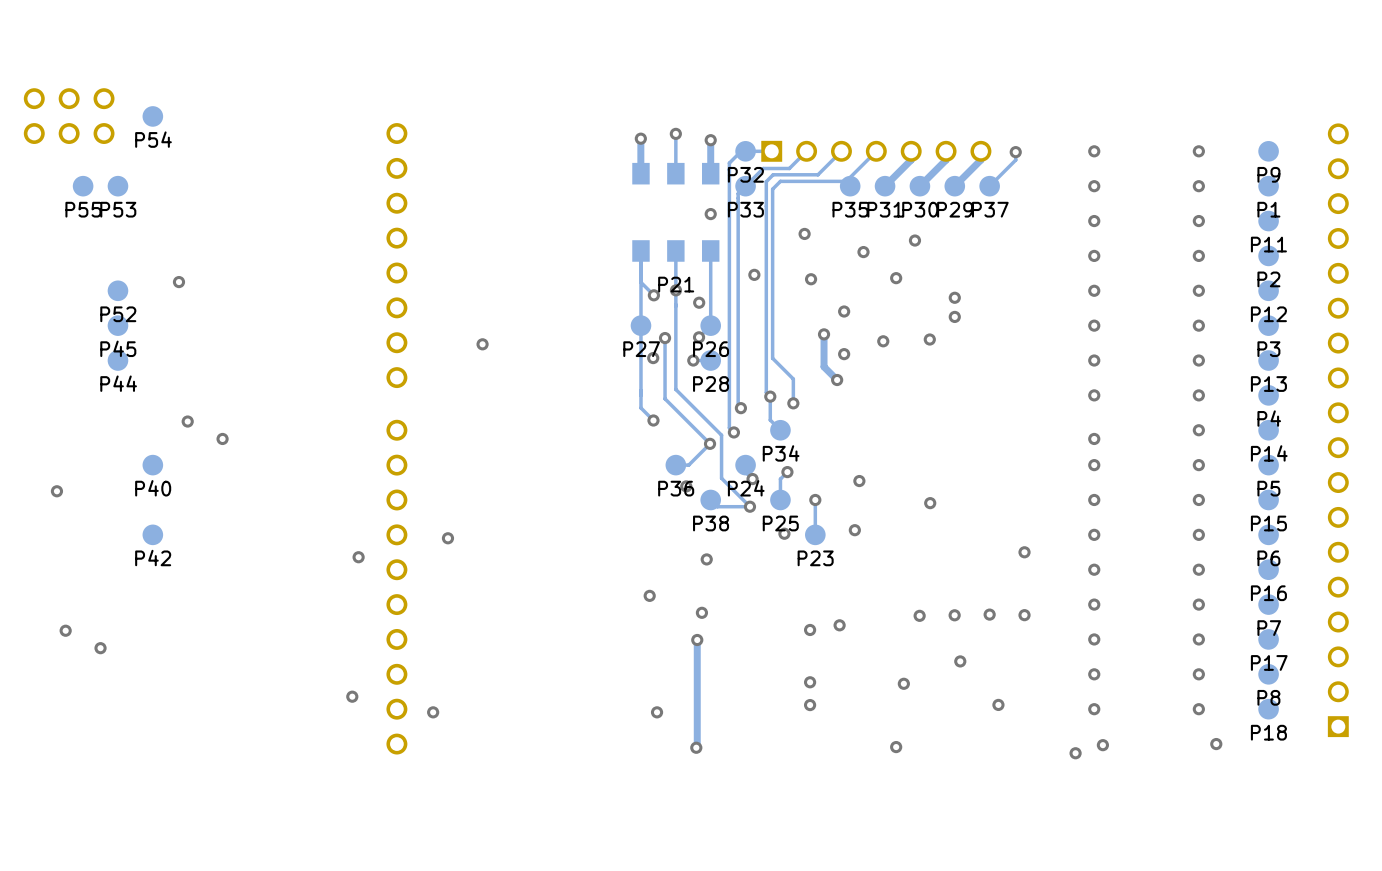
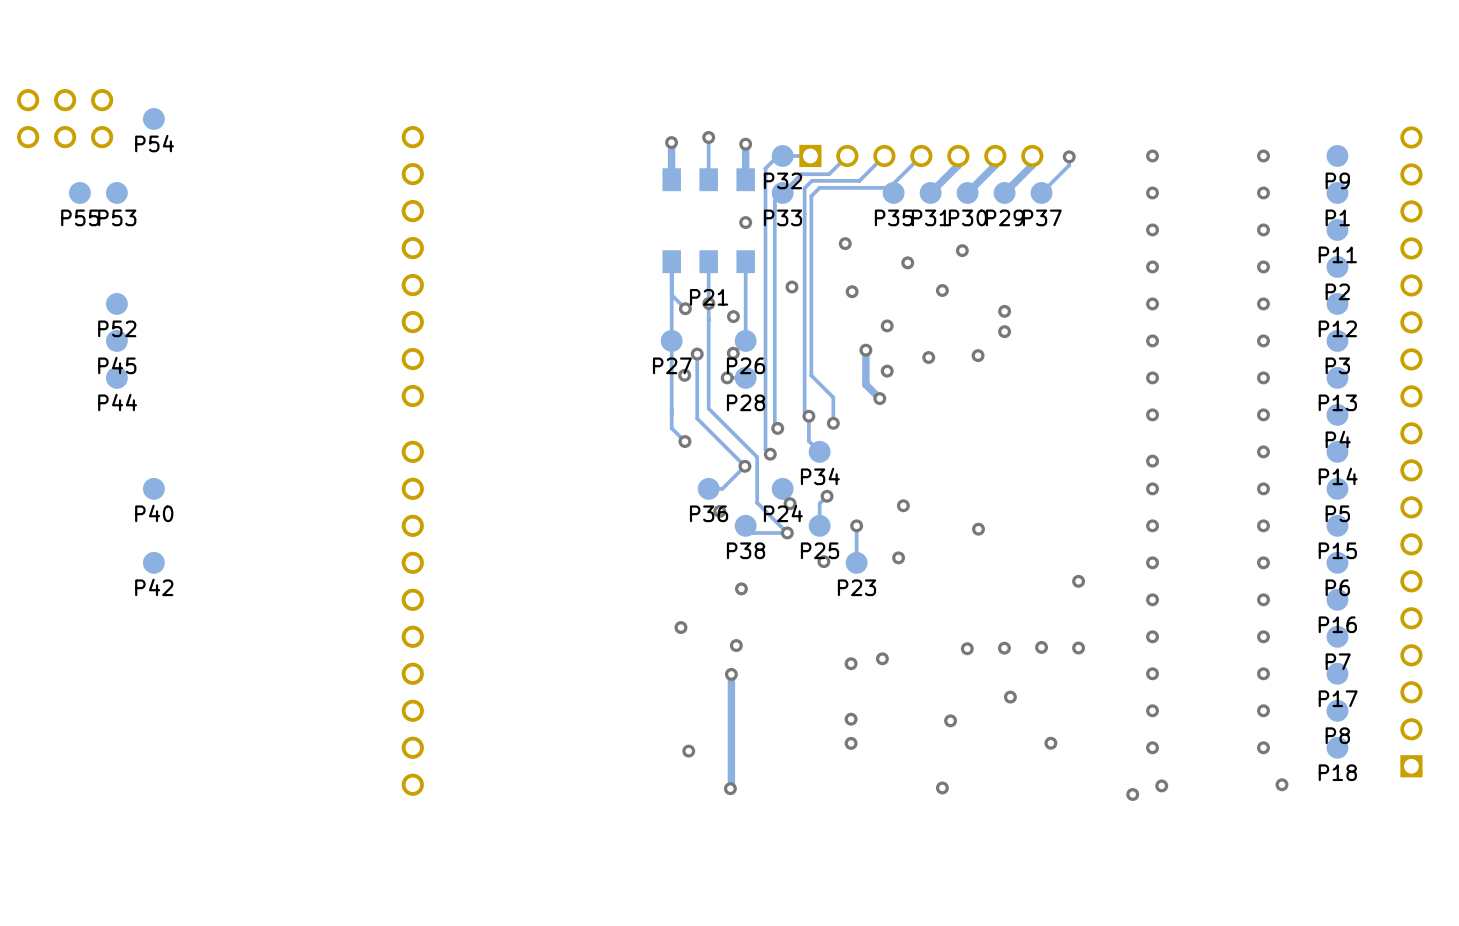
via: (178, 282) -> none
via: (482, 344) -> none
via: (187, 421) -> none
via: (222, 438) -> none
via: (56, 491) -> none
via: (447, 538) -> none
via: (358, 557) -> none
via: (65, 630) -> none
via: (100, 648) -> none
via: (352, 696) -> none
via: (433, 712) -> none

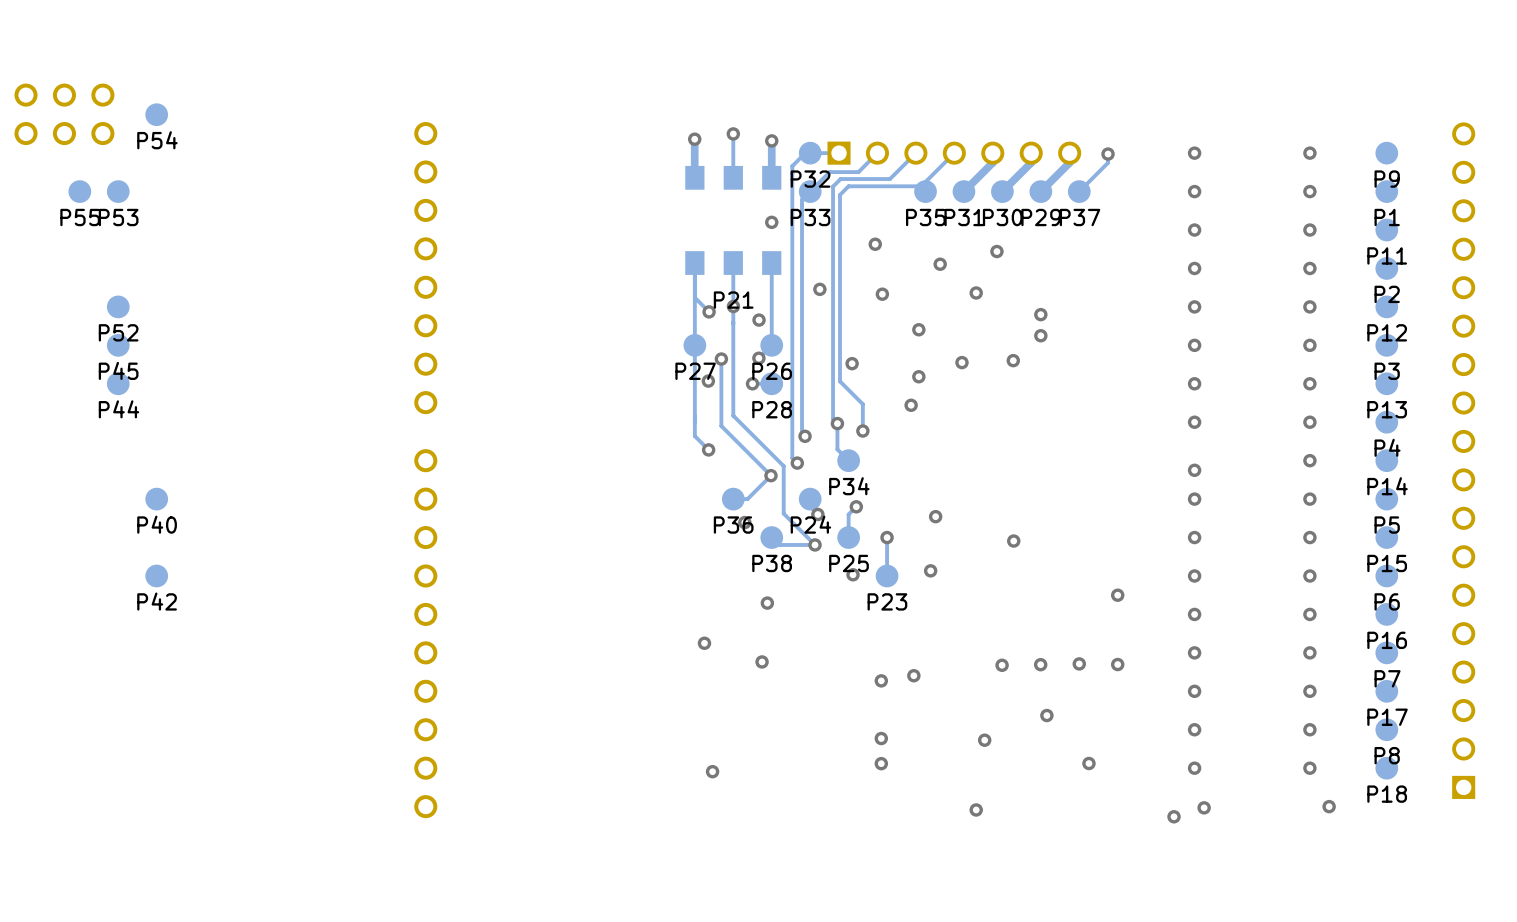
track: (865, 350) (865, 384) (879, 398) -> none
via position: (865, 350) -> (852, 363)
track: (731, 674) (730, 788) -> none
via: (731, 674) -> none
via: (730, 788) -> none

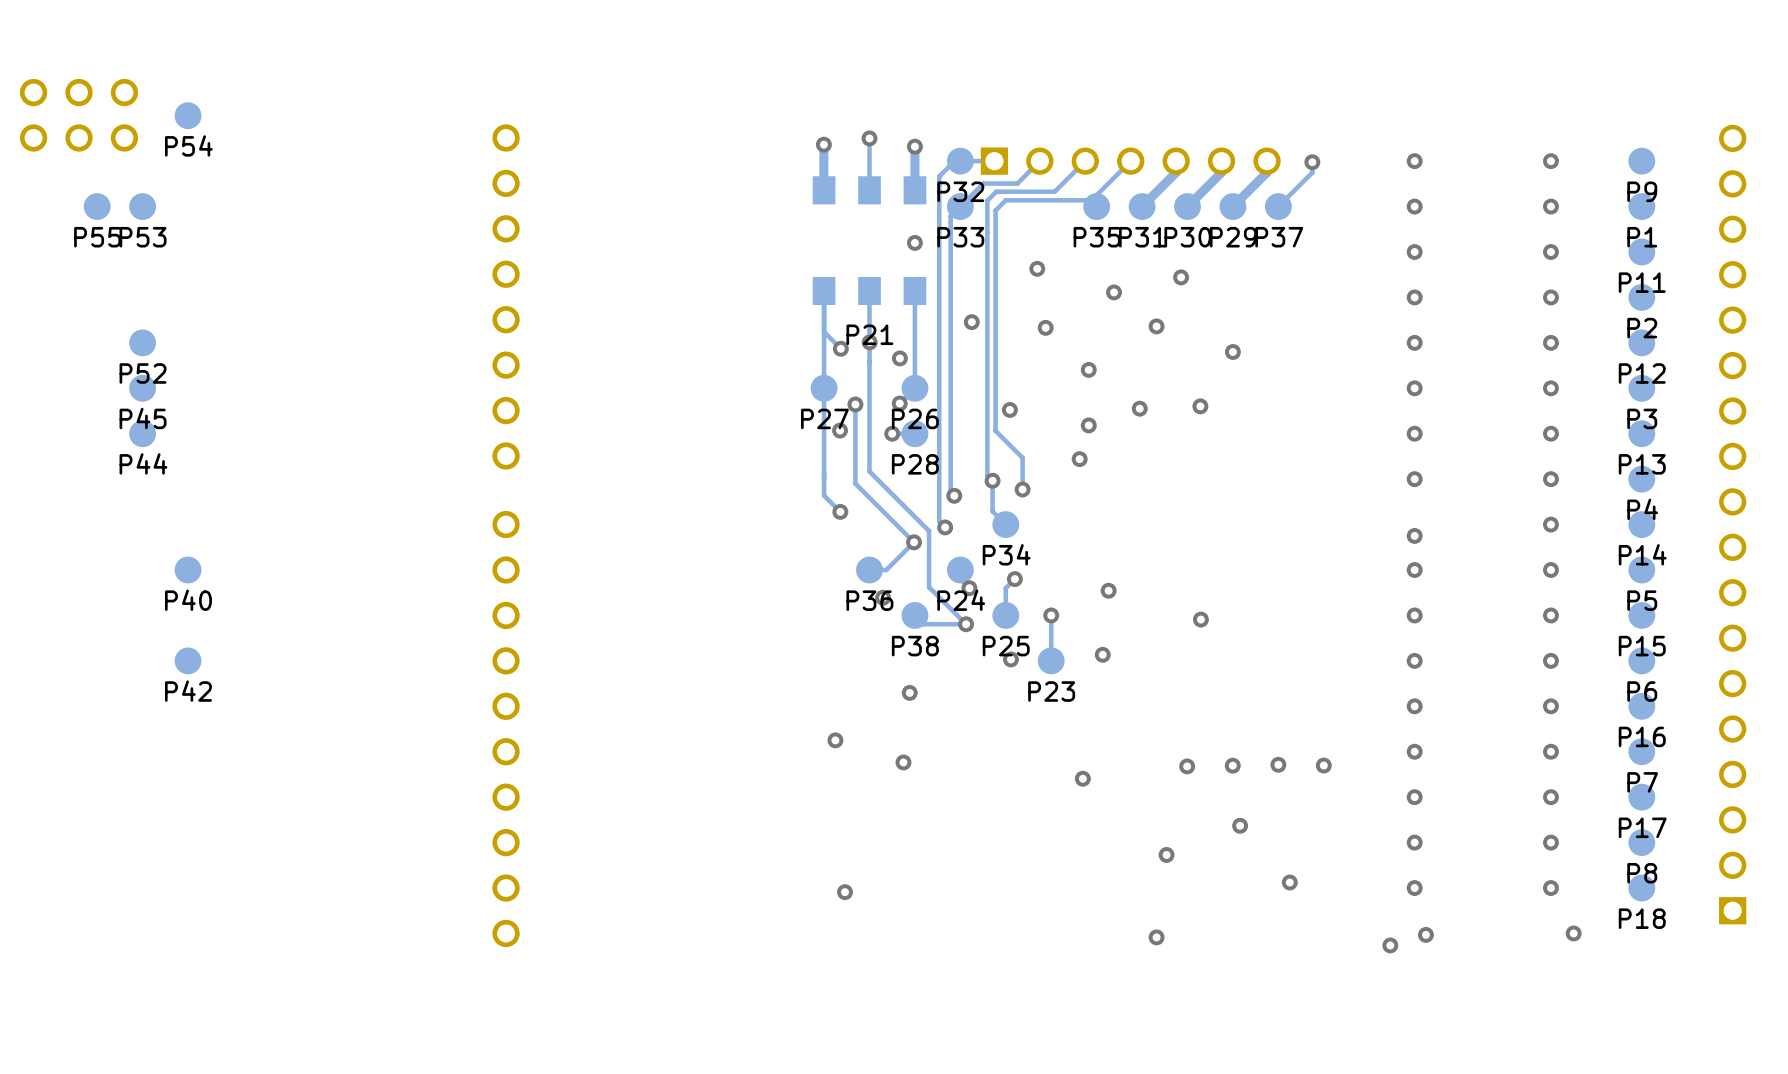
via: (1040, 335) -> none
via: (1117, 595) -> none
via: (881, 680) -> none
via: (881, 738) -> none
via: (881, 763) -> none

